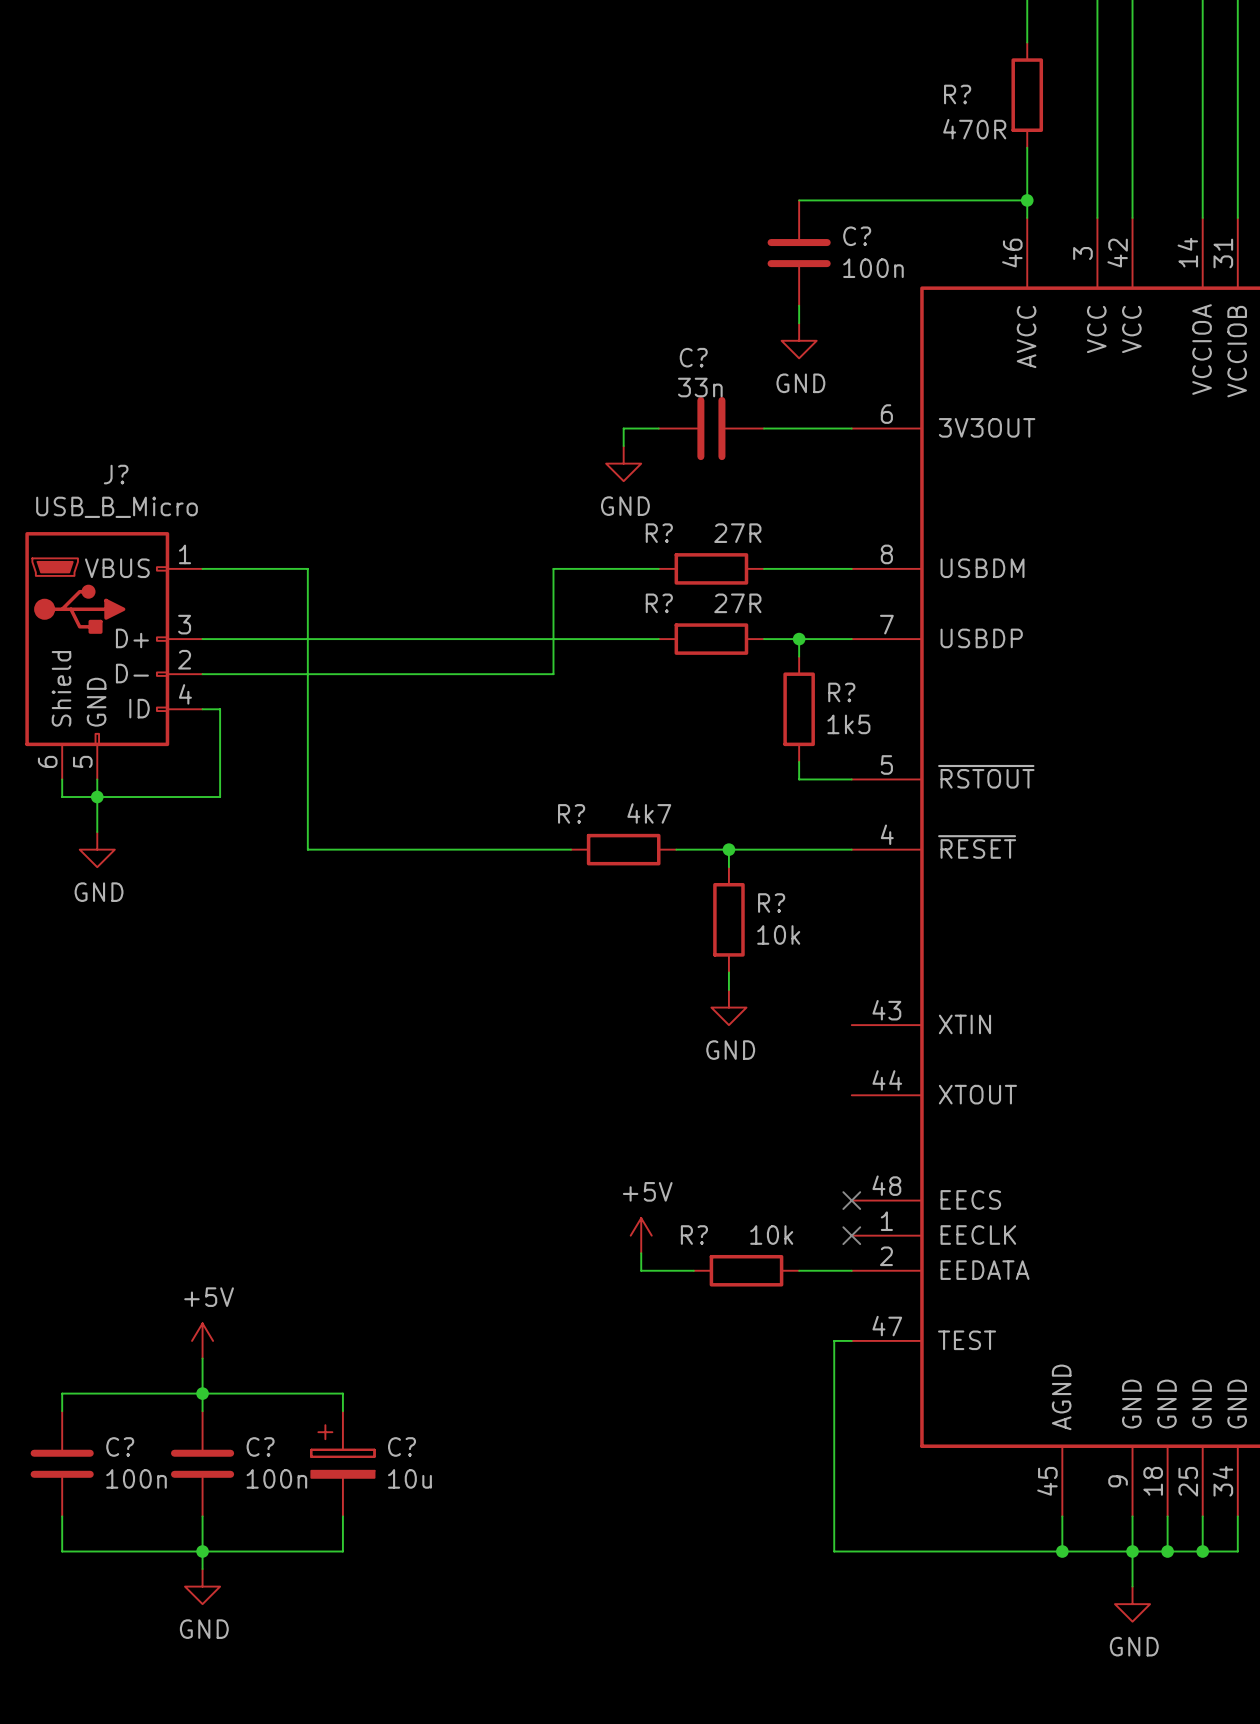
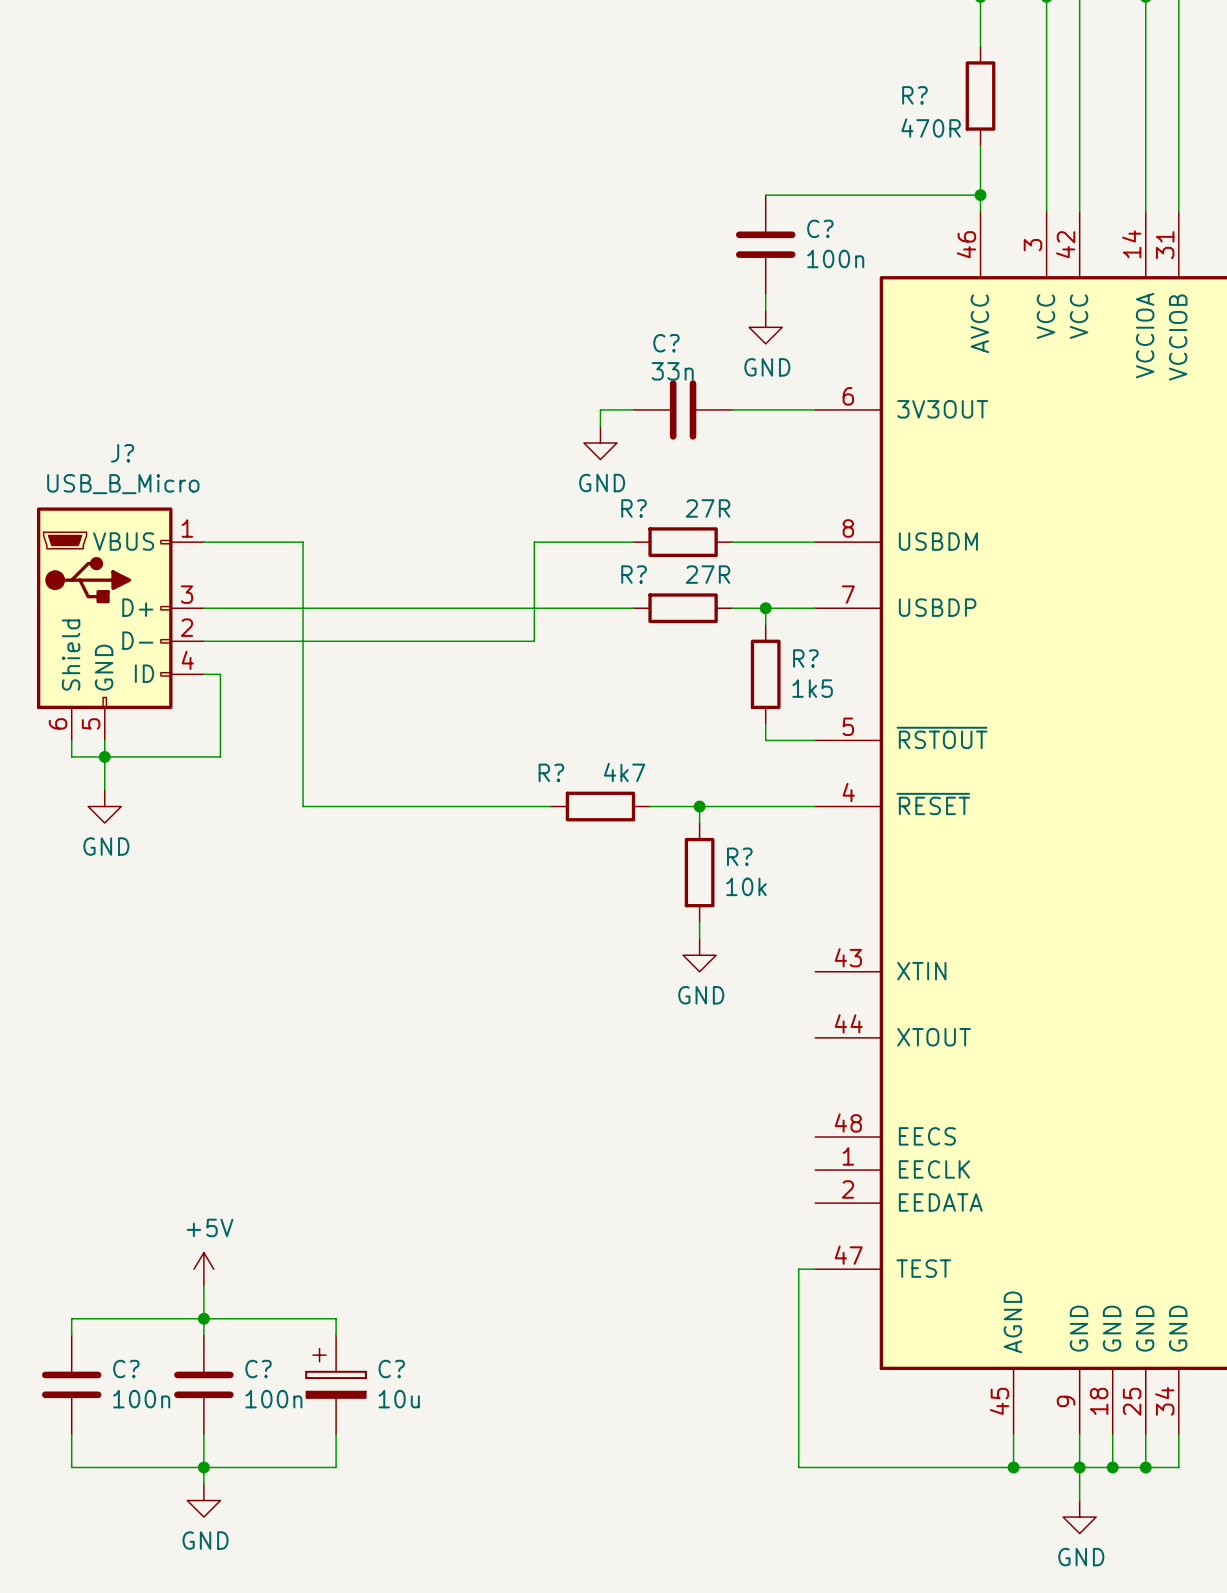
no-connect mark: (851, 1200) -> none
power symbol: +5V (641, 1235) -> none
no-connect mark: (851, 1235) -> none
wire: (641, 1253) (641, 1270) (693, 1270) -> none
R?: 10k (746, 1270) -> none
wire: (799, 1270) (851, 1270) -> none

